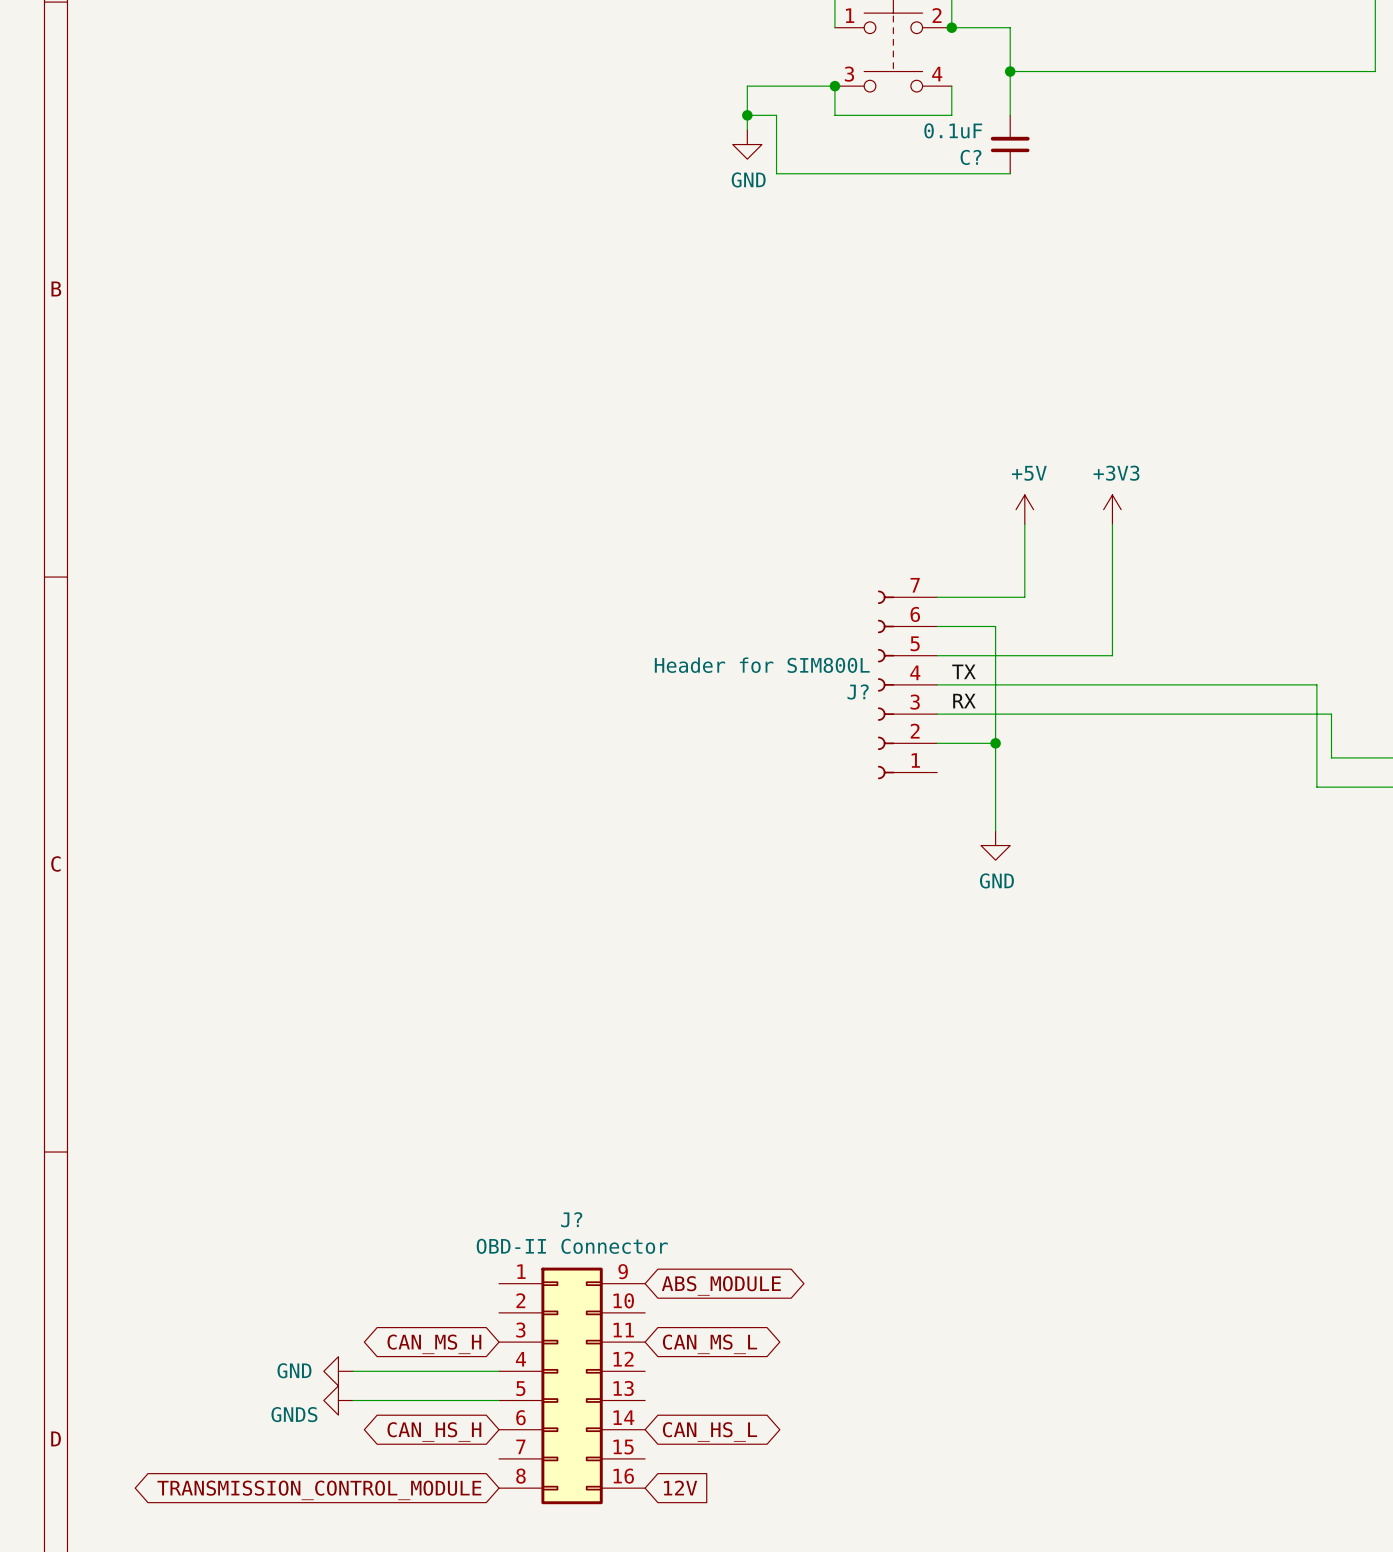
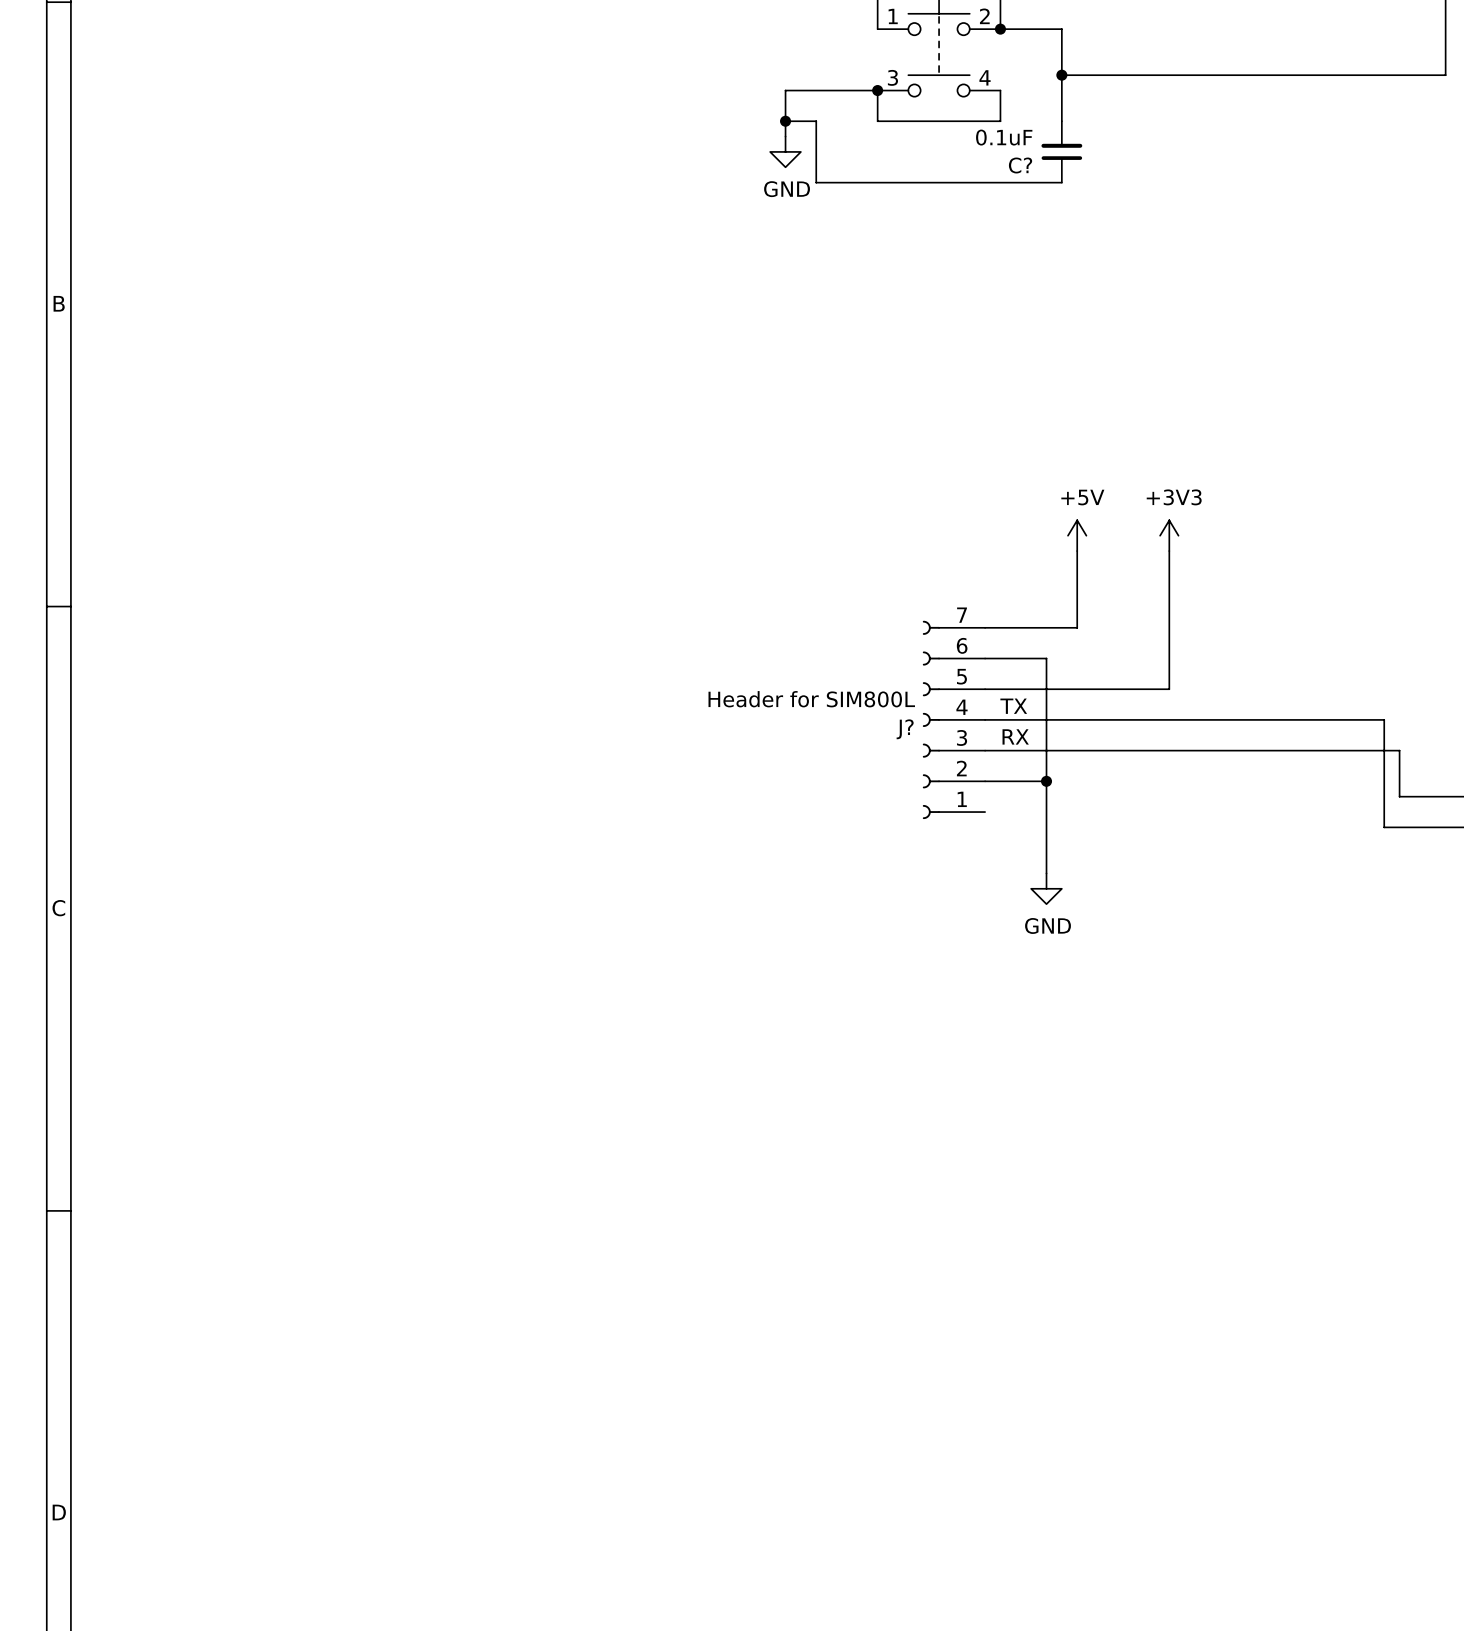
global label: ABS_MODULE (721, 1285) -> none
global label: CAN_MS_H (434, 1344) -> none
global label: CAN_MS_L (709, 1344) -> none
power symbol: GND (338, 1371) -> none
wire: (353, 1371) (499, 1371) -> none
J?: OBD-II Connector (572, 1385) -> none
power symbol: GNDS (338, 1400) -> none
wire: (353, 1400) (499, 1400) -> none
global label: CAN_HS_H (434, 1431) -> none
global label: CAN_HS_L (709, 1431) -> none
global label: 12V (680, 1488) -> none
global label: TRANSMISSION_CONTROL_MODULE (319, 1490) -> none

